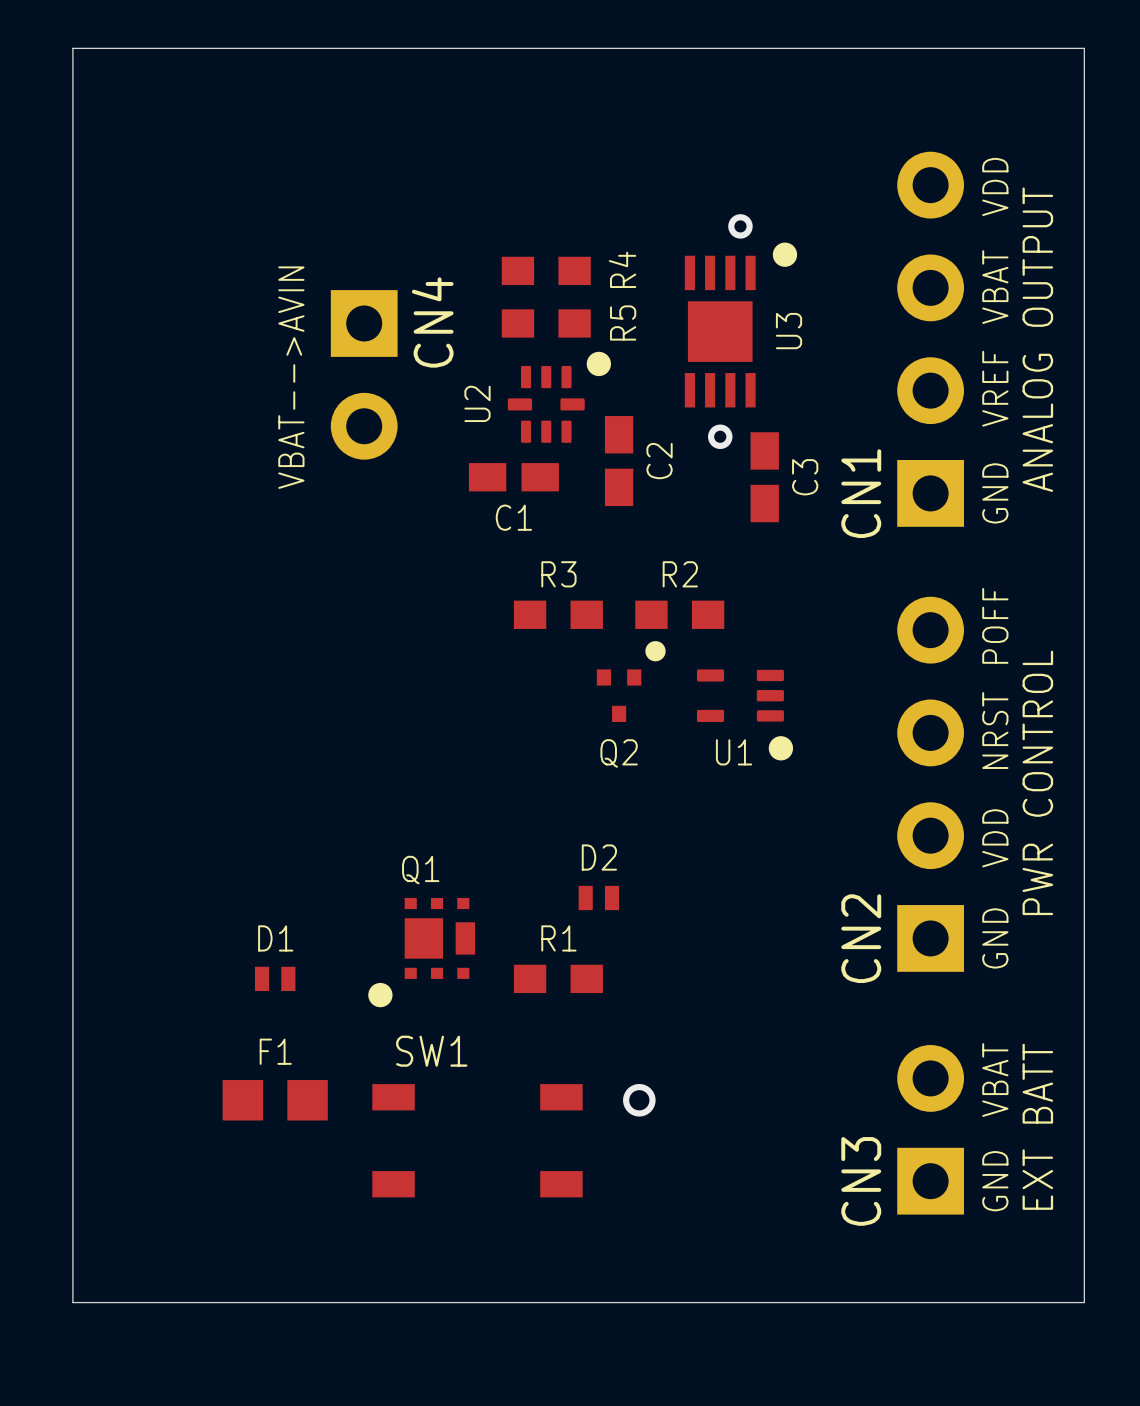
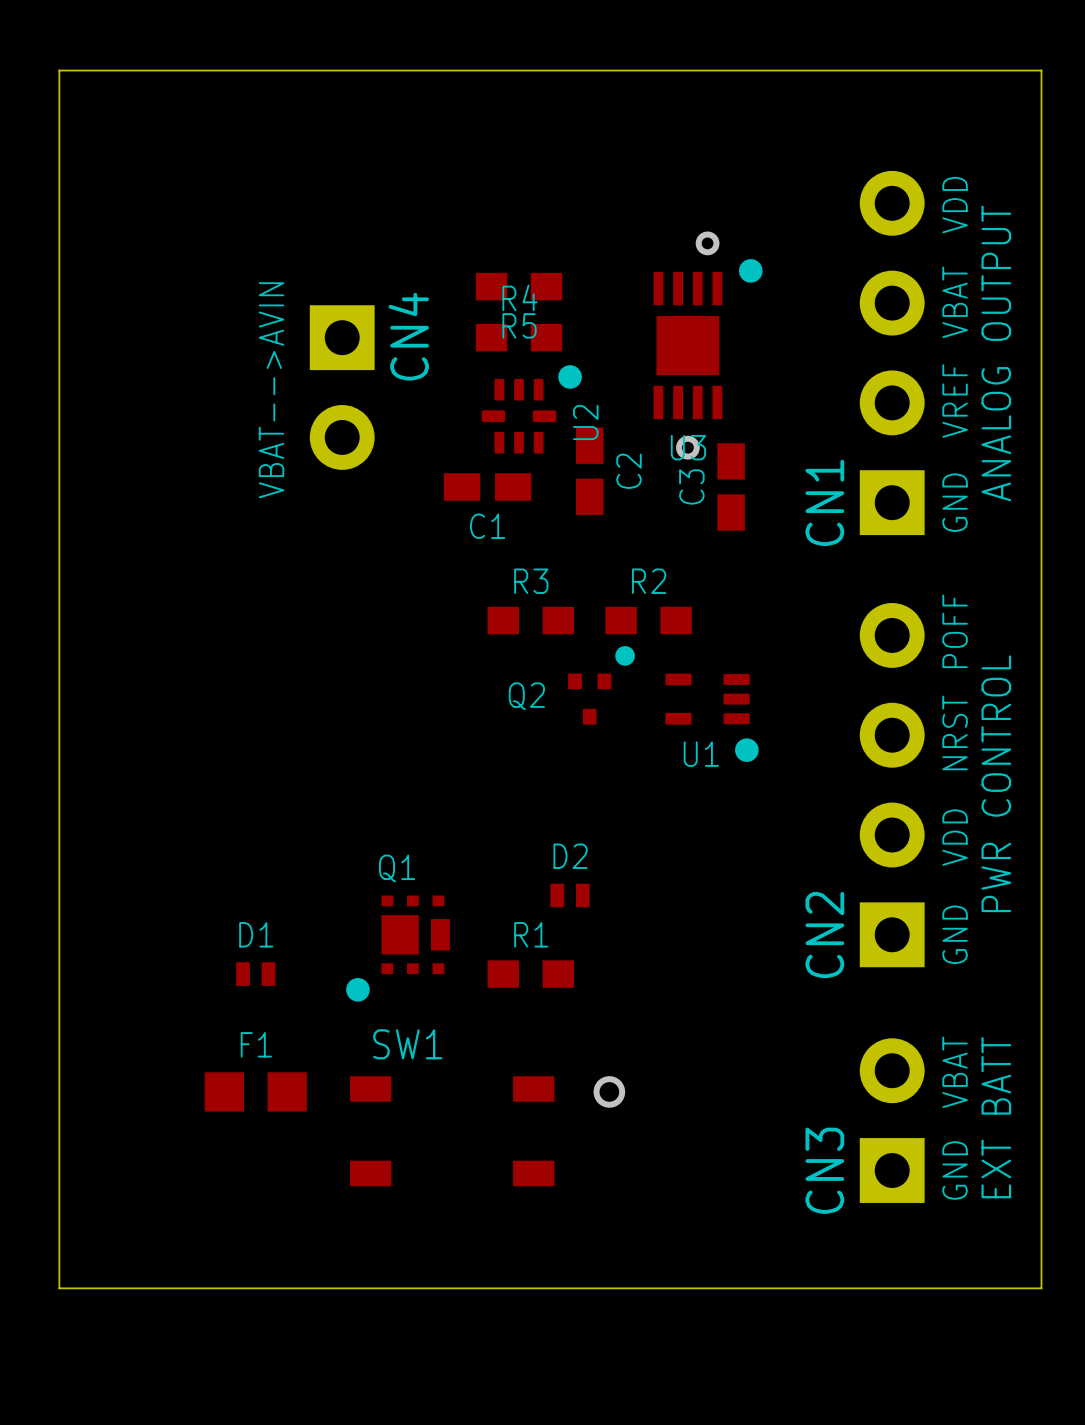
R4 name rotation: 0° (622, 269) -> 90° clockwise (520, 297)
R4 name position: R4 (622, 269) -> R4 (520, 297)
R5 name rotation: 0° (623, 322) -> 90° clockwise (519, 325)
R5 name position: R5 (623, 322) -> R5 (519, 325)
U3 name rotation: 0° (789, 331) -> 90° clockwise (688, 447)
U3 name position: U3 (789, 331) -> U3 (688, 447)
U2 name position: U2 (477, 403) -> U2 (585, 422)
C3 name position: C3 (805, 477) -> C3 (691, 486)
Q2 name position: Q2 (619, 753) -> Q2 (526, 696)

